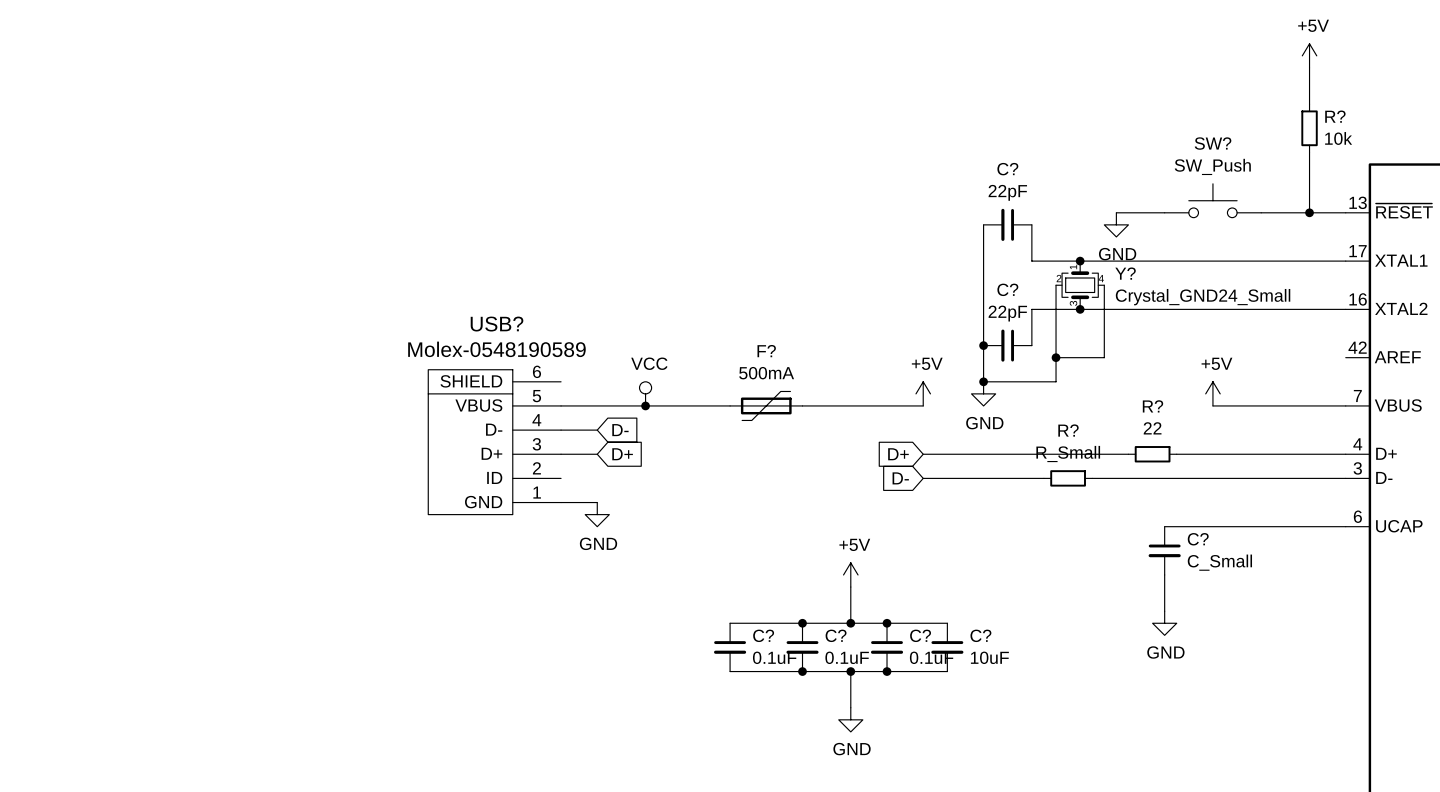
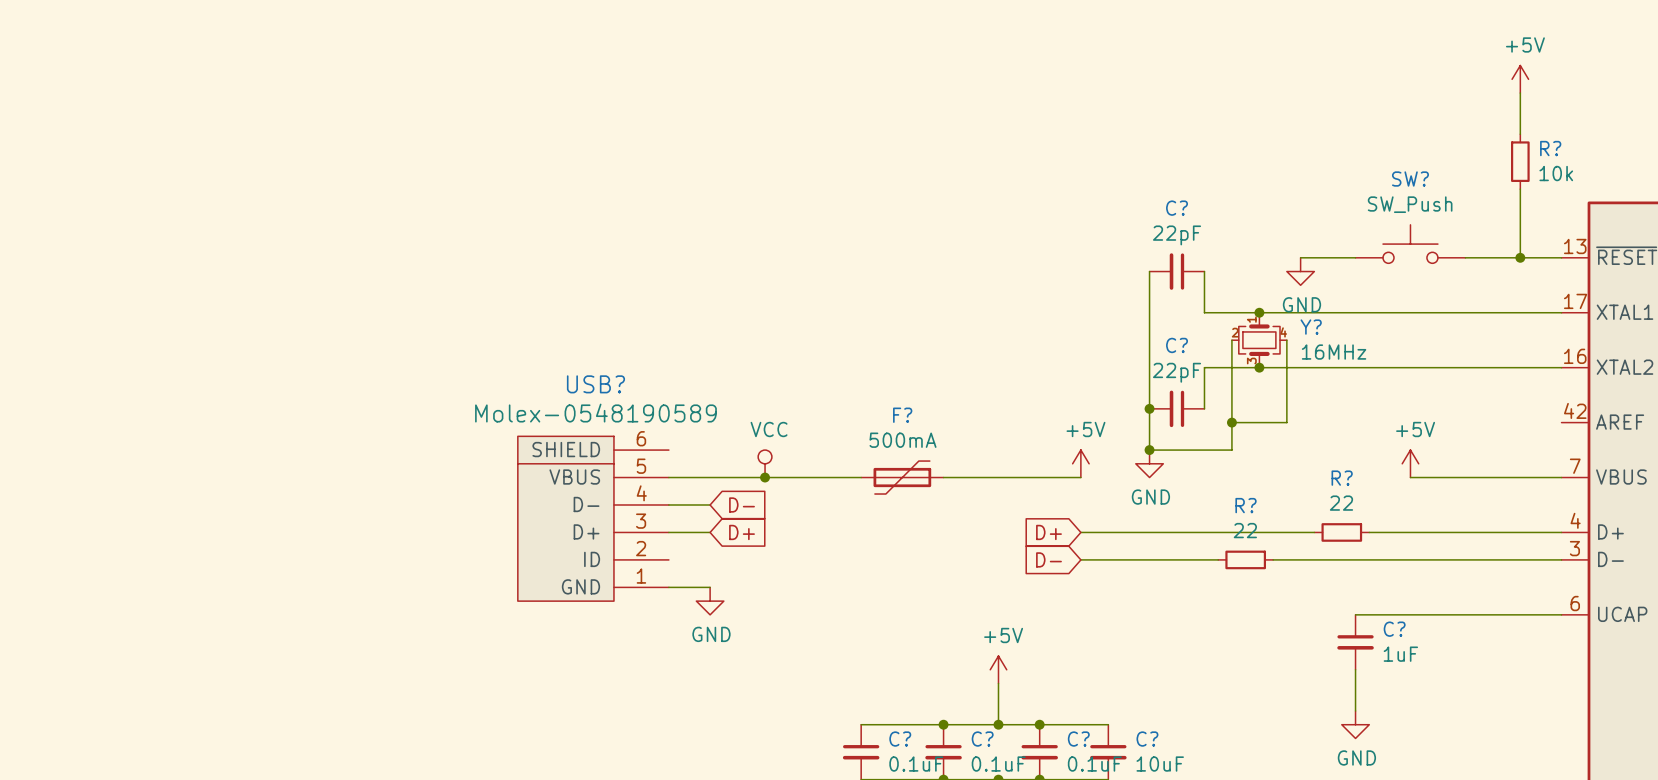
Y? value: Crystal_GND24_Small (1203, 297) -> 16MHz (1334, 352)
R? value: R_Small (1068, 454) -> 22 (1245, 530)
C? value: C_Small (1219, 562) -> 1uF (1400, 654)

